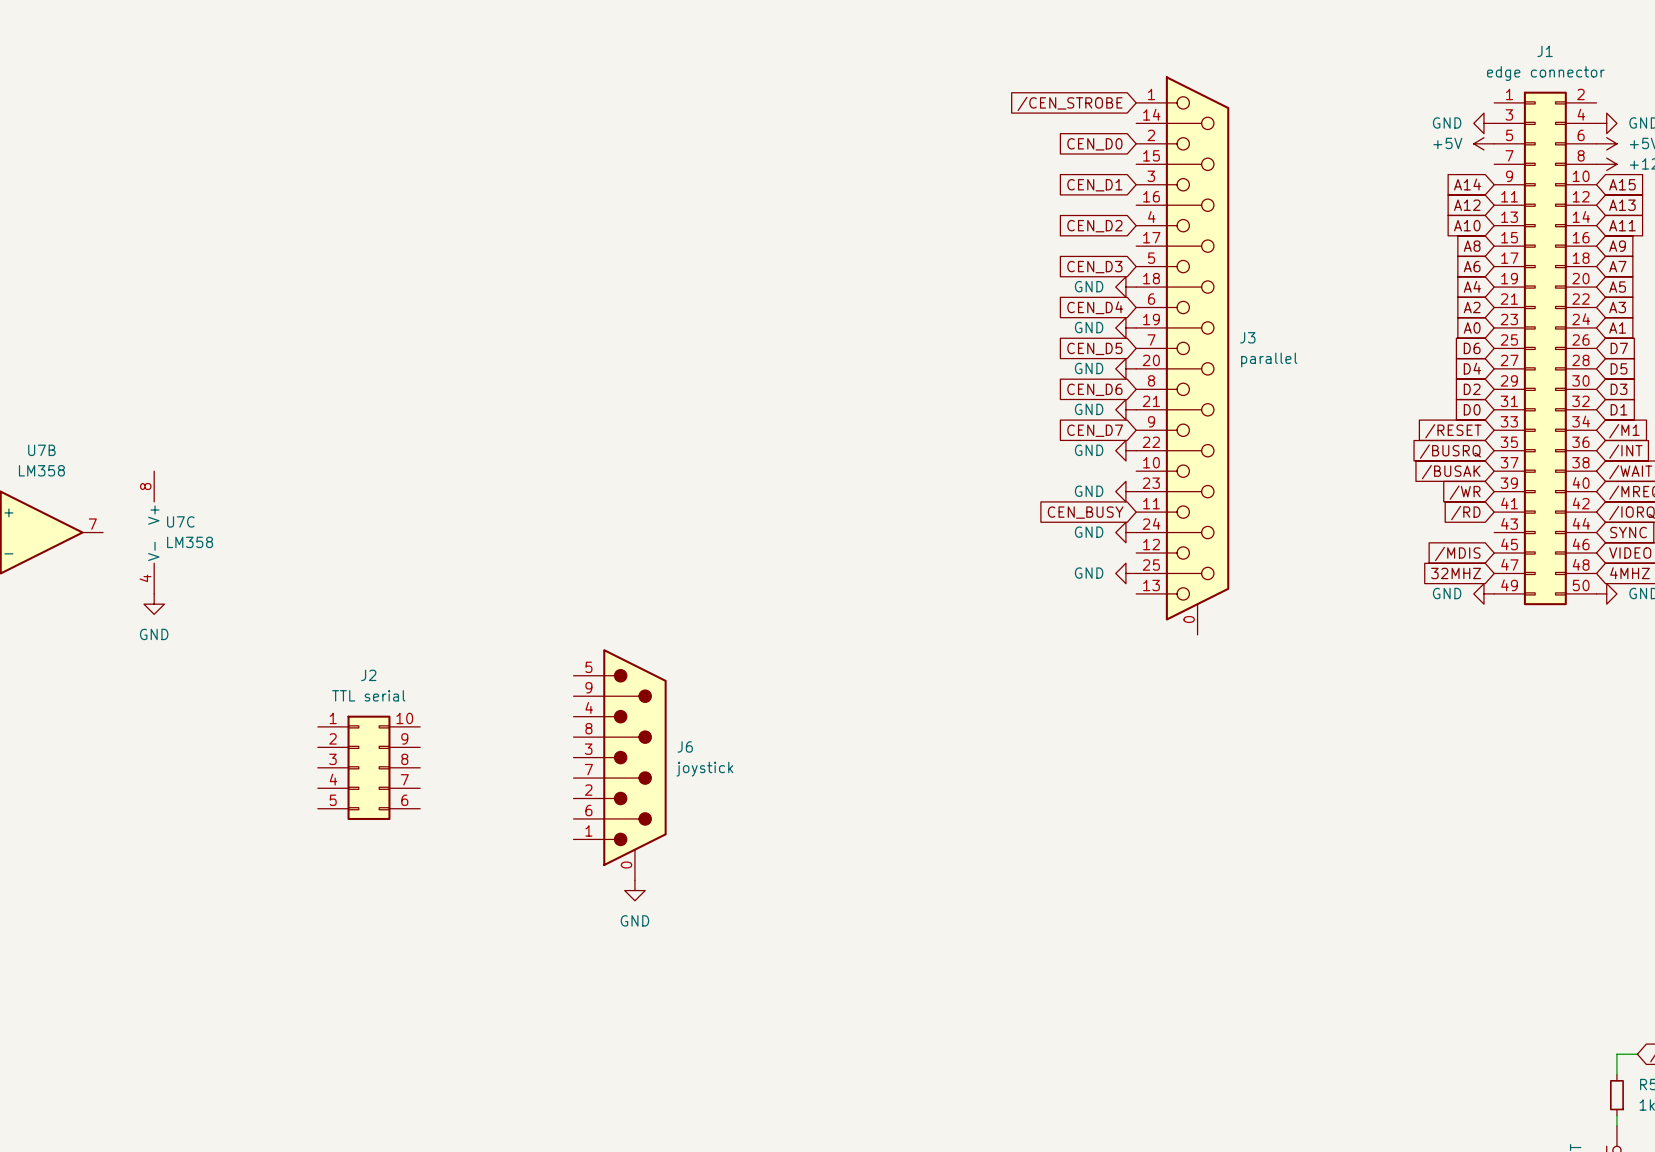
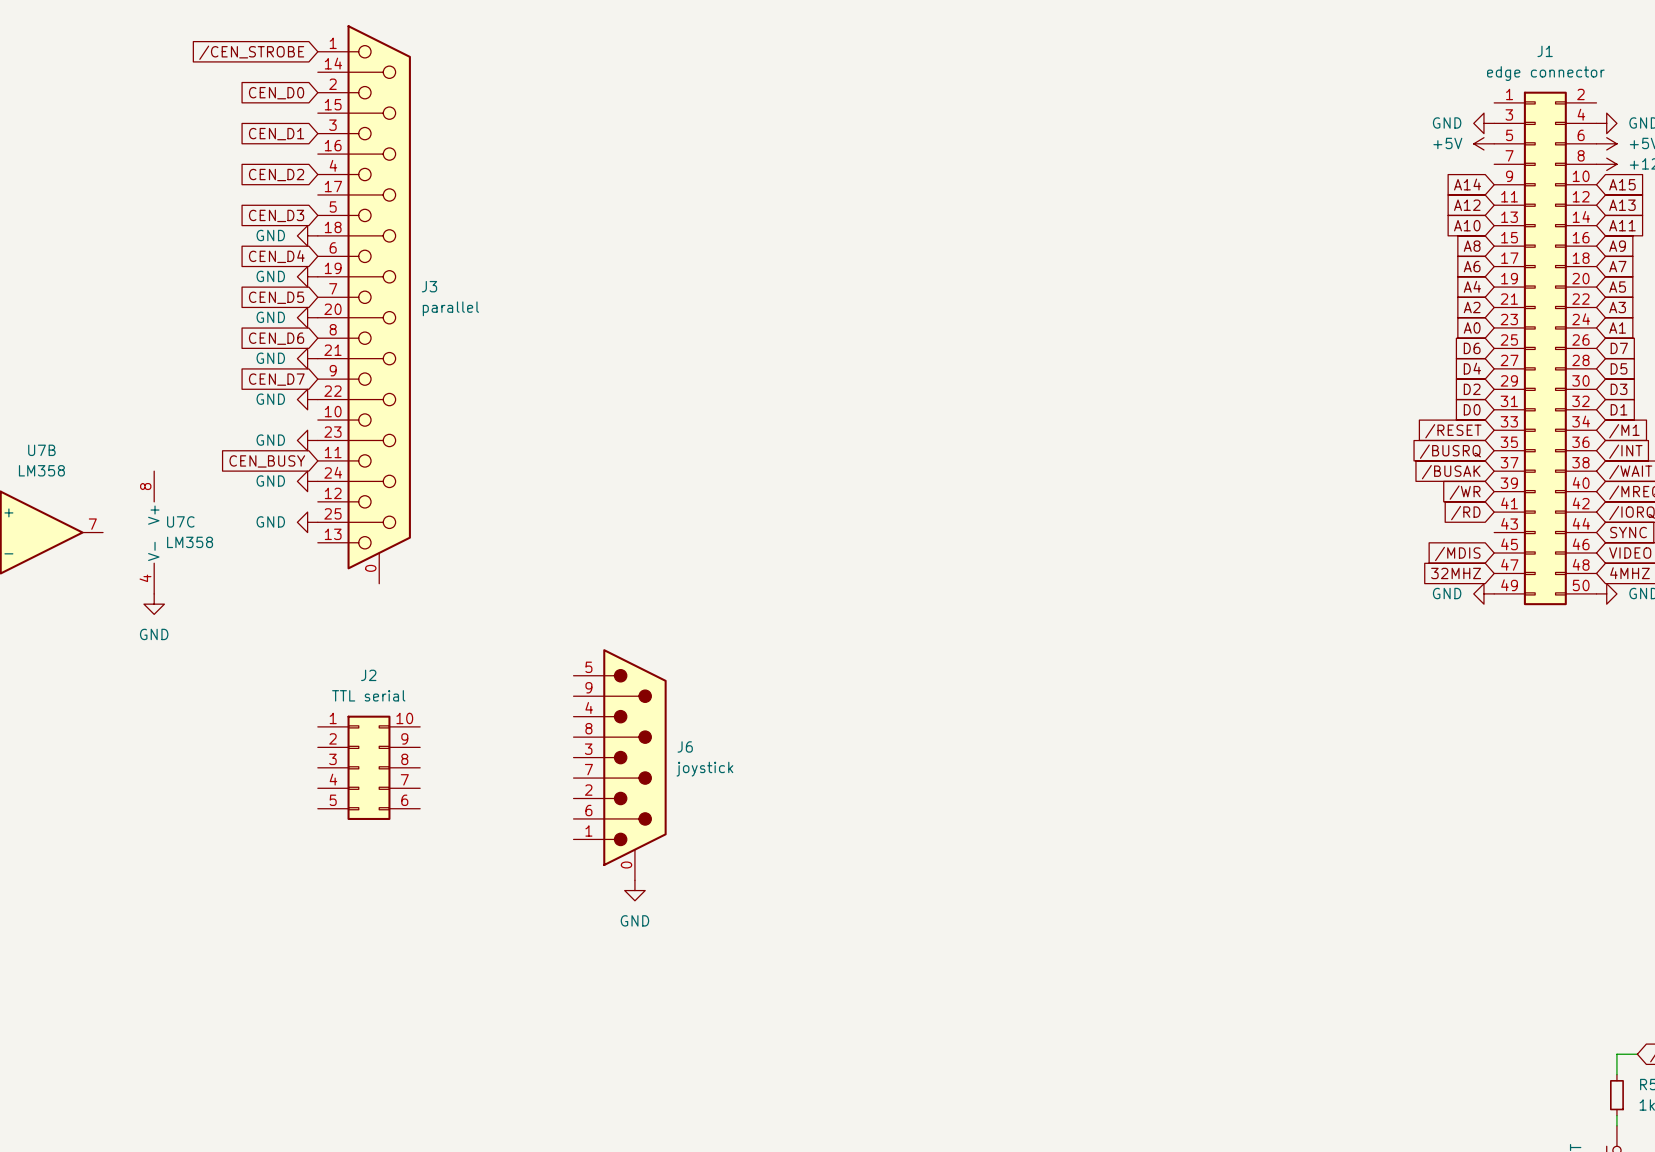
global label: none -> /CEN_STROBE (251, 52)
global label: none -> CEN_D0 (276, 93)
global label: /CEN_STROBE (1070, 103) -> none
global label: none -> CEN_D1 (276, 134)
global label: CEN_D0 (1094, 144) -> none
global label: none -> CEN_D2 (276, 175)
global label: CEN_D1 (1094, 185) -> none
global label: none -> CEN_D3 (276, 215)
global label: CEN_D2 (1094, 226) -> none
power symbol: none -> GND (307, 235)
global label: none -> CEN_D4 (276, 256)
global label: CEN_D3 (1094, 267) -> none
power symbol: none -> GND (307, 276)
power symbol: GND (1125, 287) -> none
global label: none -> CEN_D5 (276, 297)
global label: CEN_D4 (1095, 307) -> none
power symbol: none -> GND (307, 317)
power symbol: GND (1125, 327) -> none
global label: none -> CEN_D6 (276, 338)
global label: CEN_D5 (1094, 348) -> none
J3 position: (1182, 355) -> (364, 304)
power symbol: none -> GND (307, 358)
power symbol: GND (1125, 368) -> none
global label: none -> CEN_D7 (276, 379)
global label: CEN_D6 (1094, 389) -> none
power symbol: none -> GND (307, 399)
power symbol: GND (1125, 409) -> none
global label: CEN_D7 (1095, 430) -> none
power symbol: none -> GND (307, 440)
power symbol: GND (1125, 450) -> none
global label: none -> CEN_BUSY (267, 461)
power symbol: none -> GND (307, 481)
power symbol: GND (1125, 491) -> none
global label: CEN_BUSY (1085, 512) -> none
power symbol: none -> GND (307, 522)
power symbol: GND (1125, 532) -> none
power symbol: GND (1125, 573) -> none

